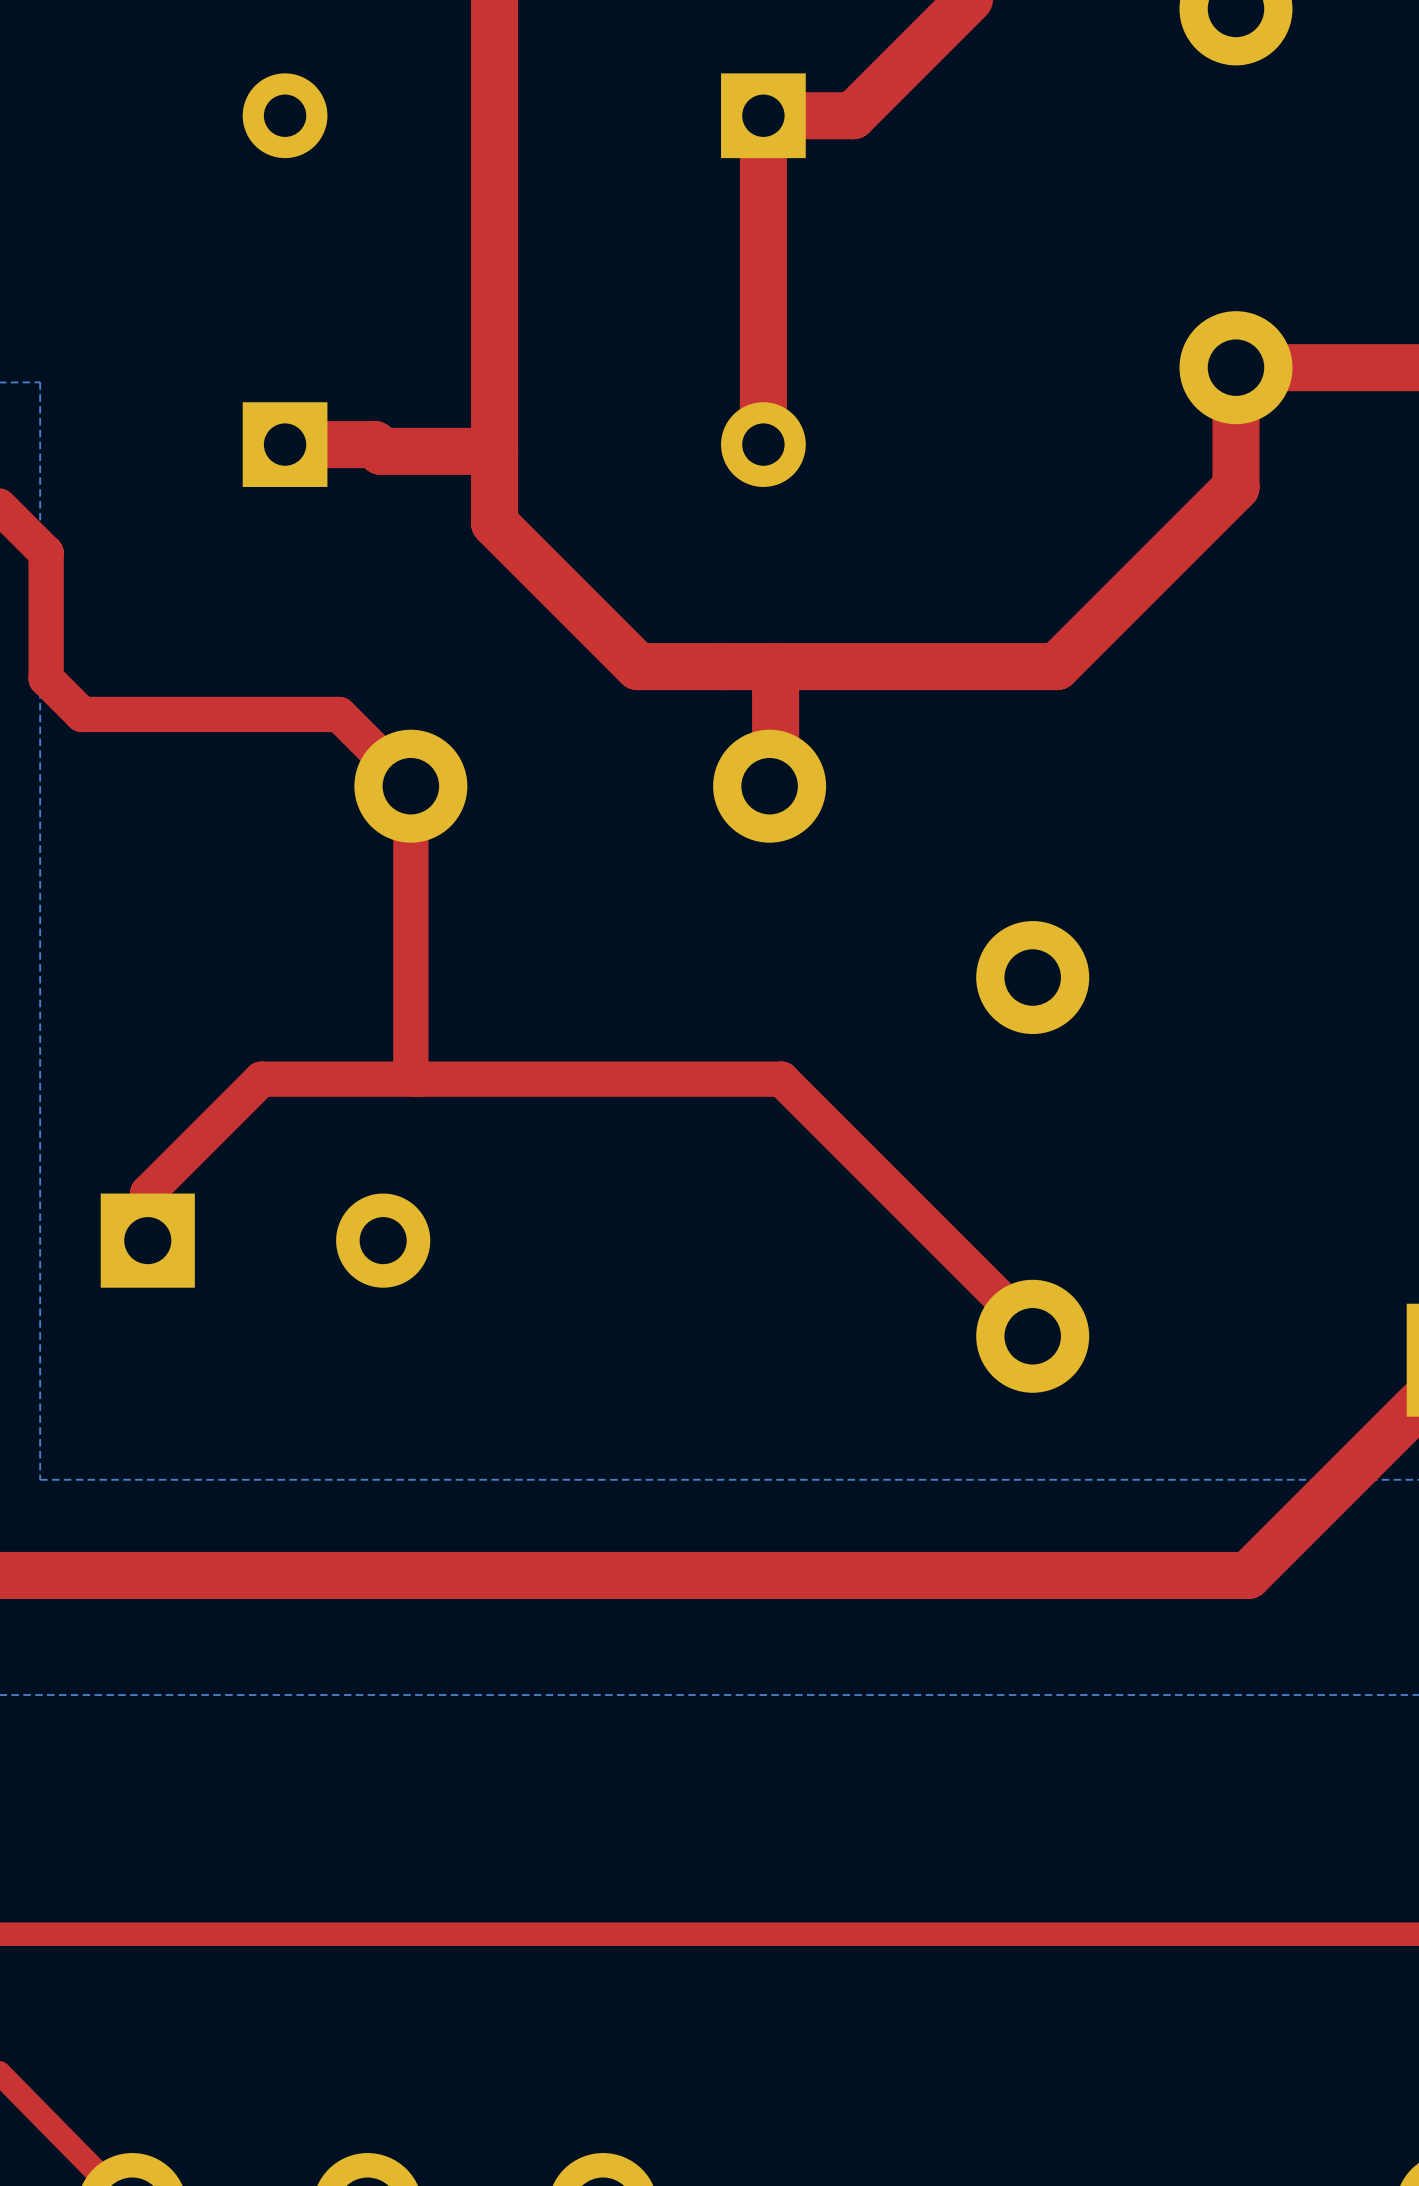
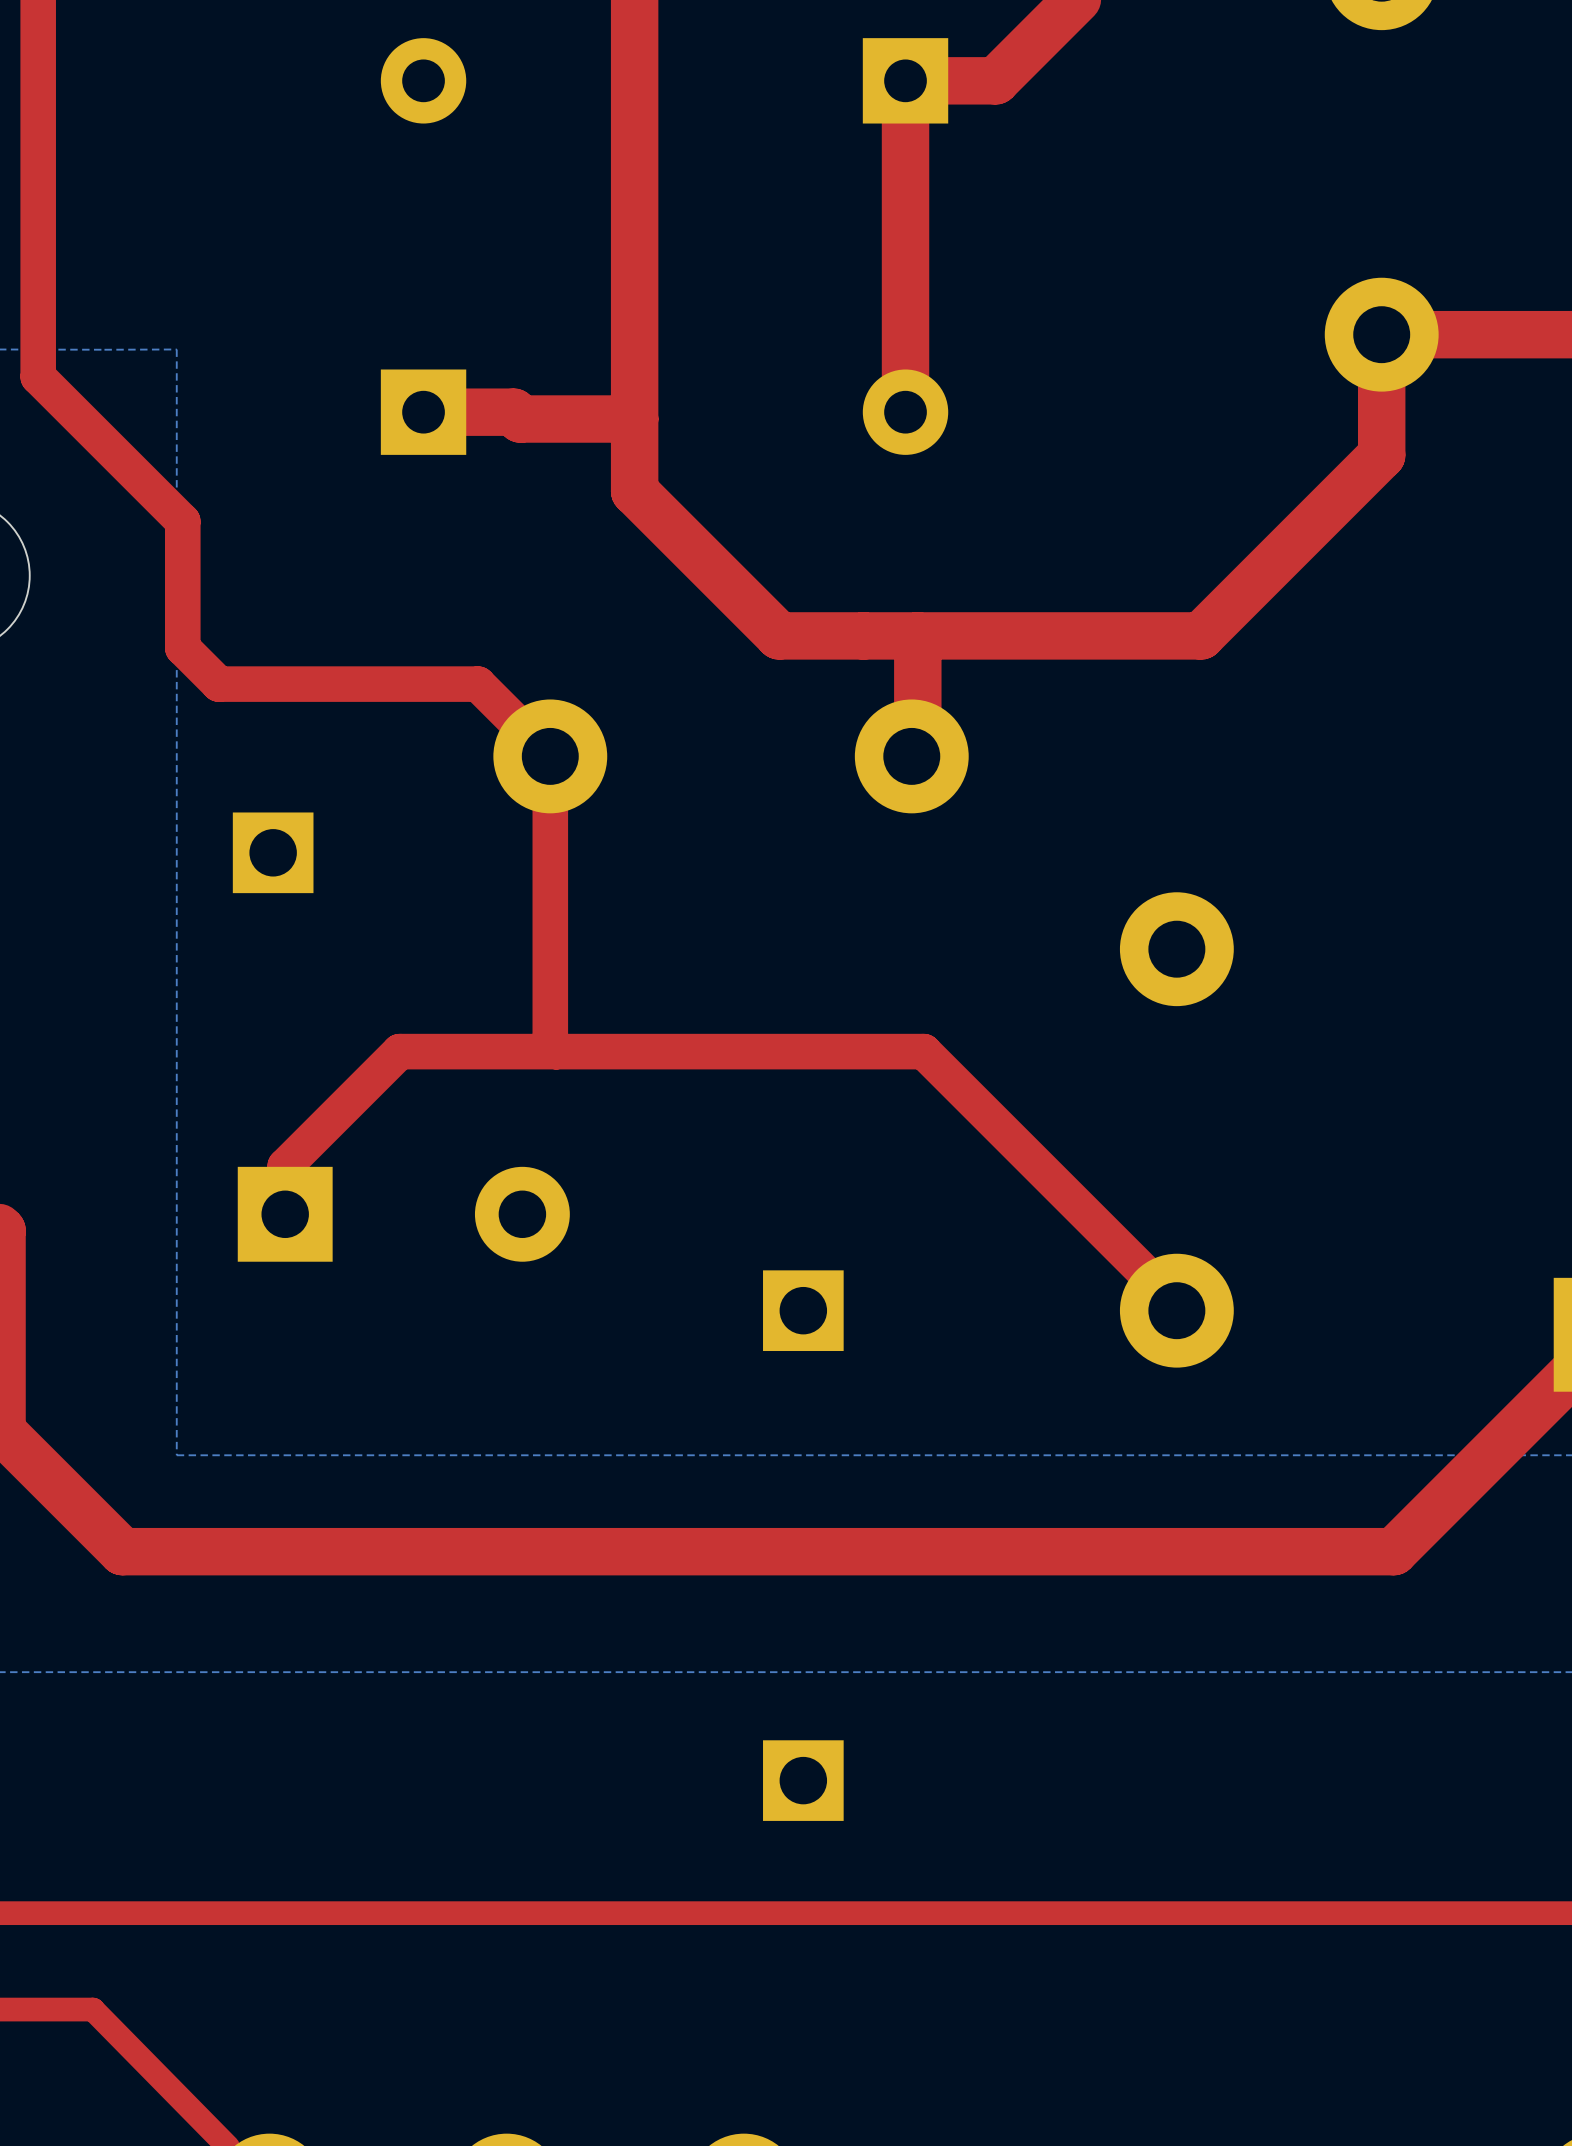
part: none -> (273, 852)
part: none -> (803, 1310)
part: none -> (803, 1780)

